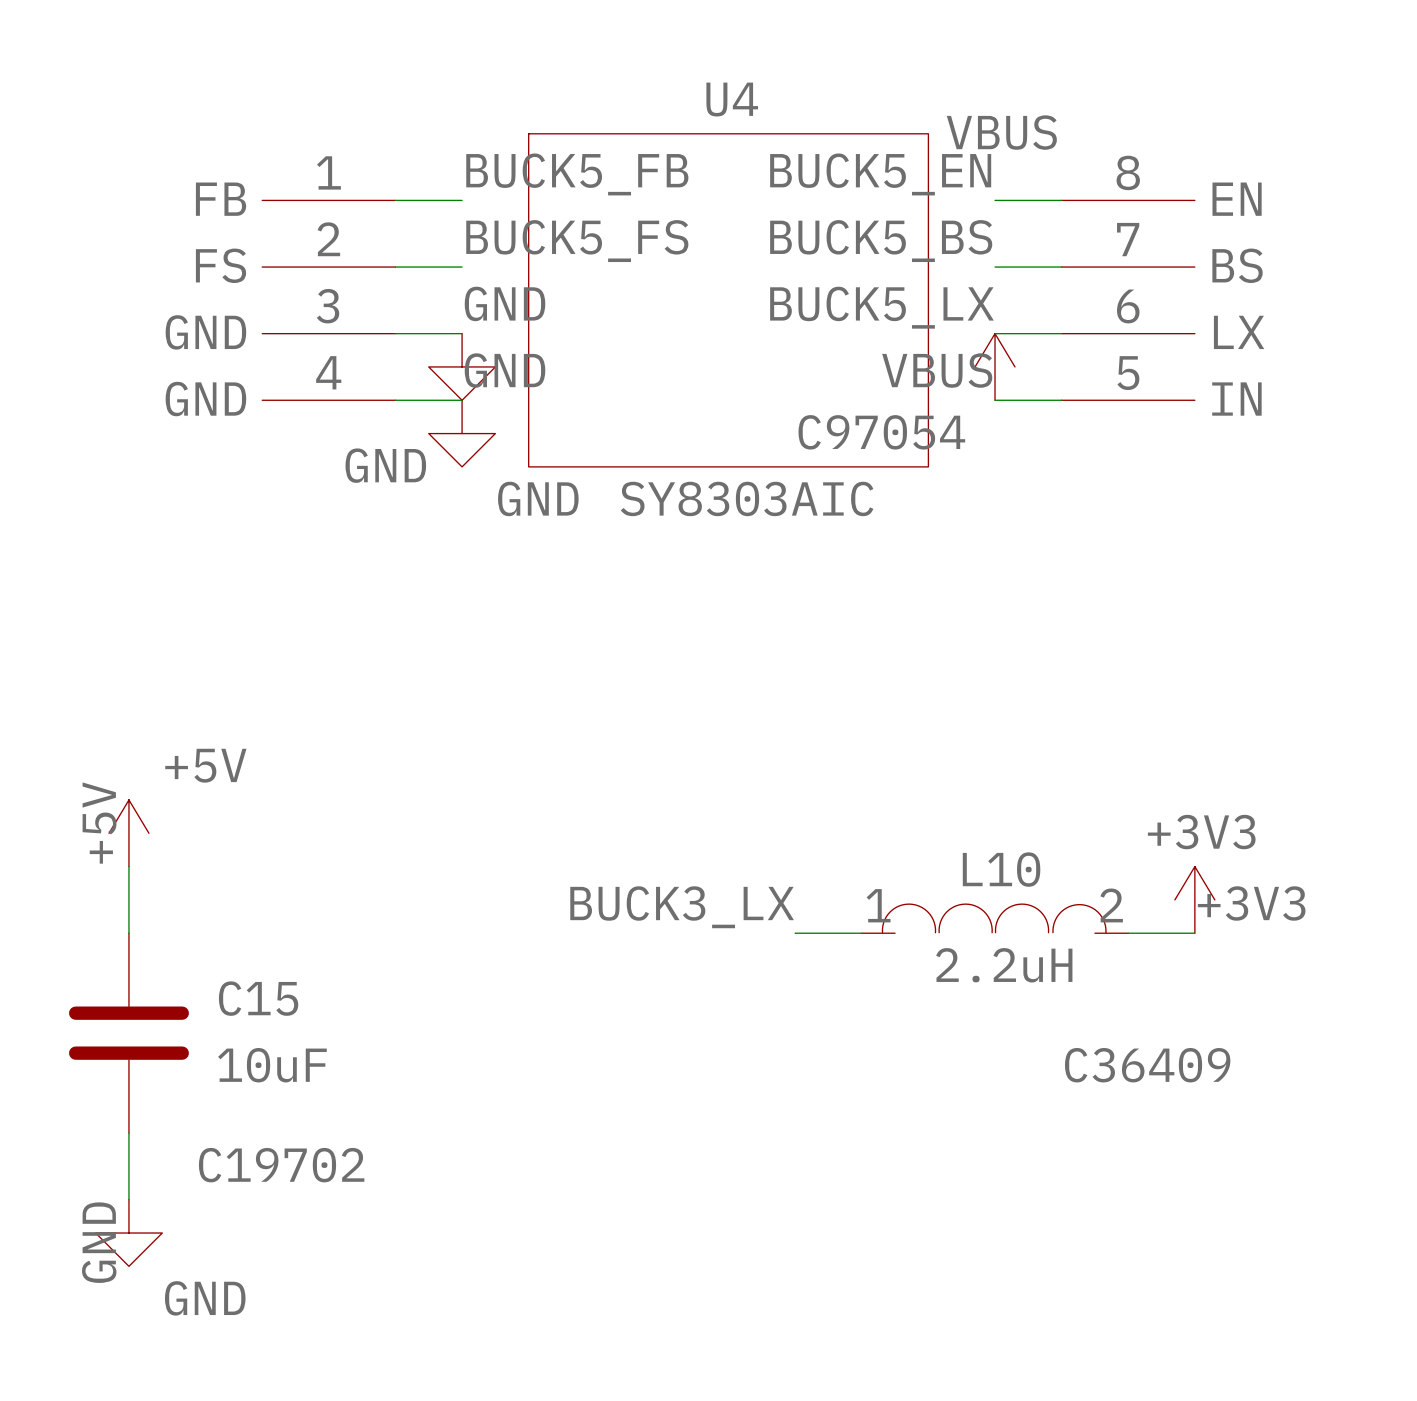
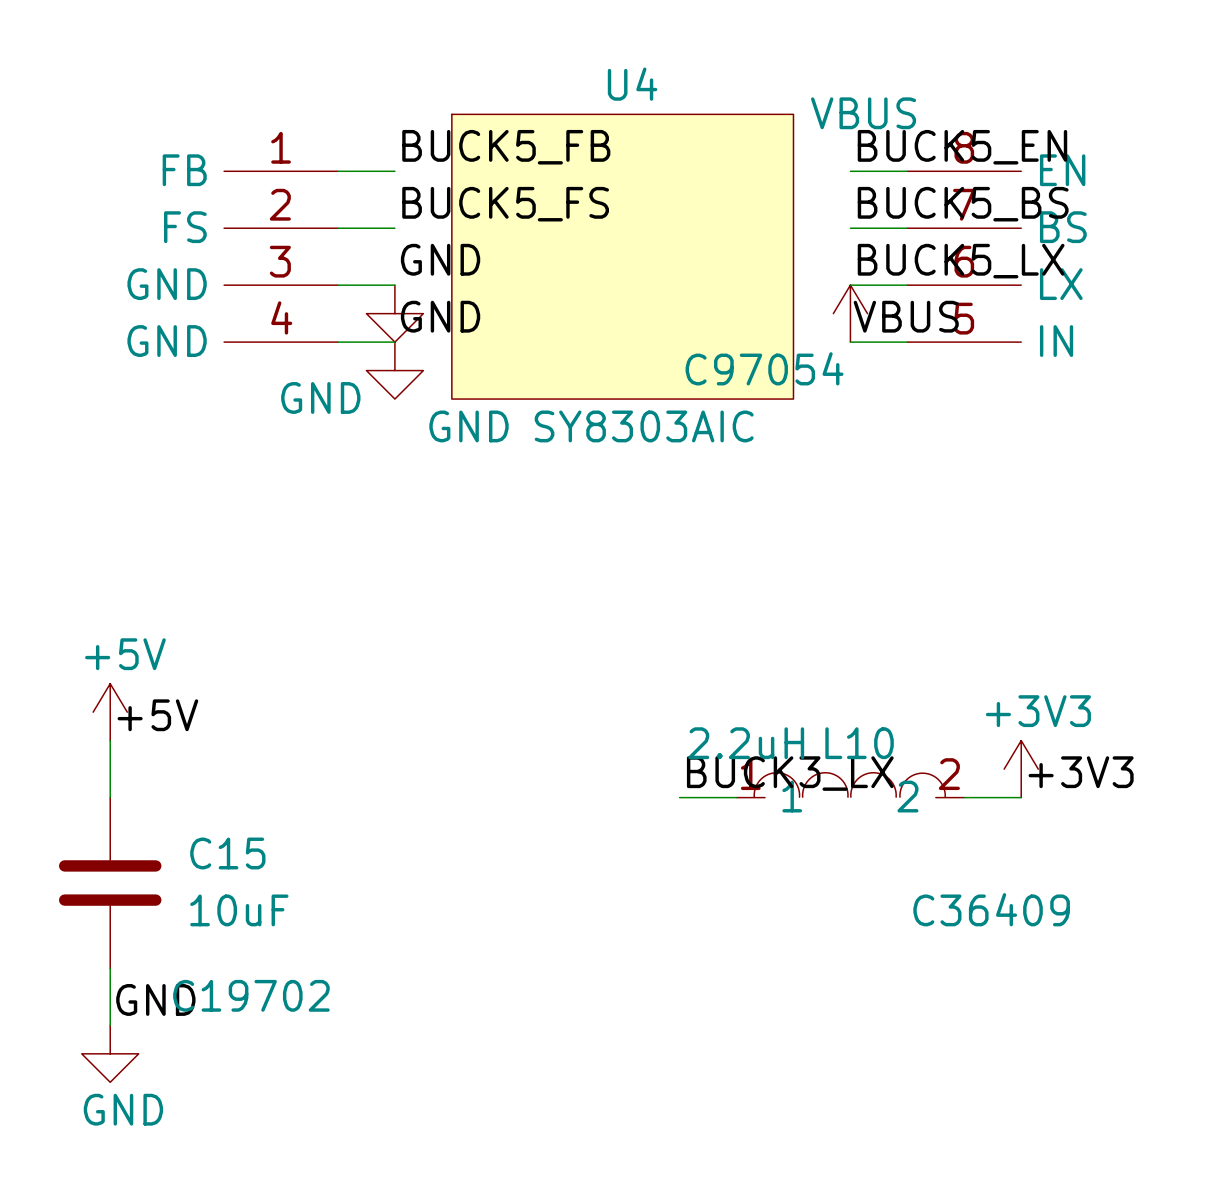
label position: BUCK5_EN (880, 174) -> BUCK5_EN (962, 147)
label position: BUCK5_BS (881, 241) -> BUCK5_BS (963, 204)
label position: BUCK5_LX (881, 307) -> BUCK5_LX (961, 261)
label position: VBUS (937, 370) -> VBUS (906, 316)
power symbol text position: +5V (205, 765) -> +5V (125, 654)
label rotation: 0° (99, 823) -> 90° clockwise (157, 715)
label position: BUCK3_LX (682, 907) -> BUCK3_LX (790, 773)
L10 pin name: none -> 1 (792, 796)
L10 pin name: none -> 2 (907, 796)
L10 value position: 2.2uH (1004, 965) -> 2.2uH (746, 743)
label rotation: 0° (99, 1242) -> 90° clockwise (155, 999)
label position: GND (99, 1242) -> GND (155, 999)
power symbol text position: GND (205, 1298) -> GND (123, 1109)

